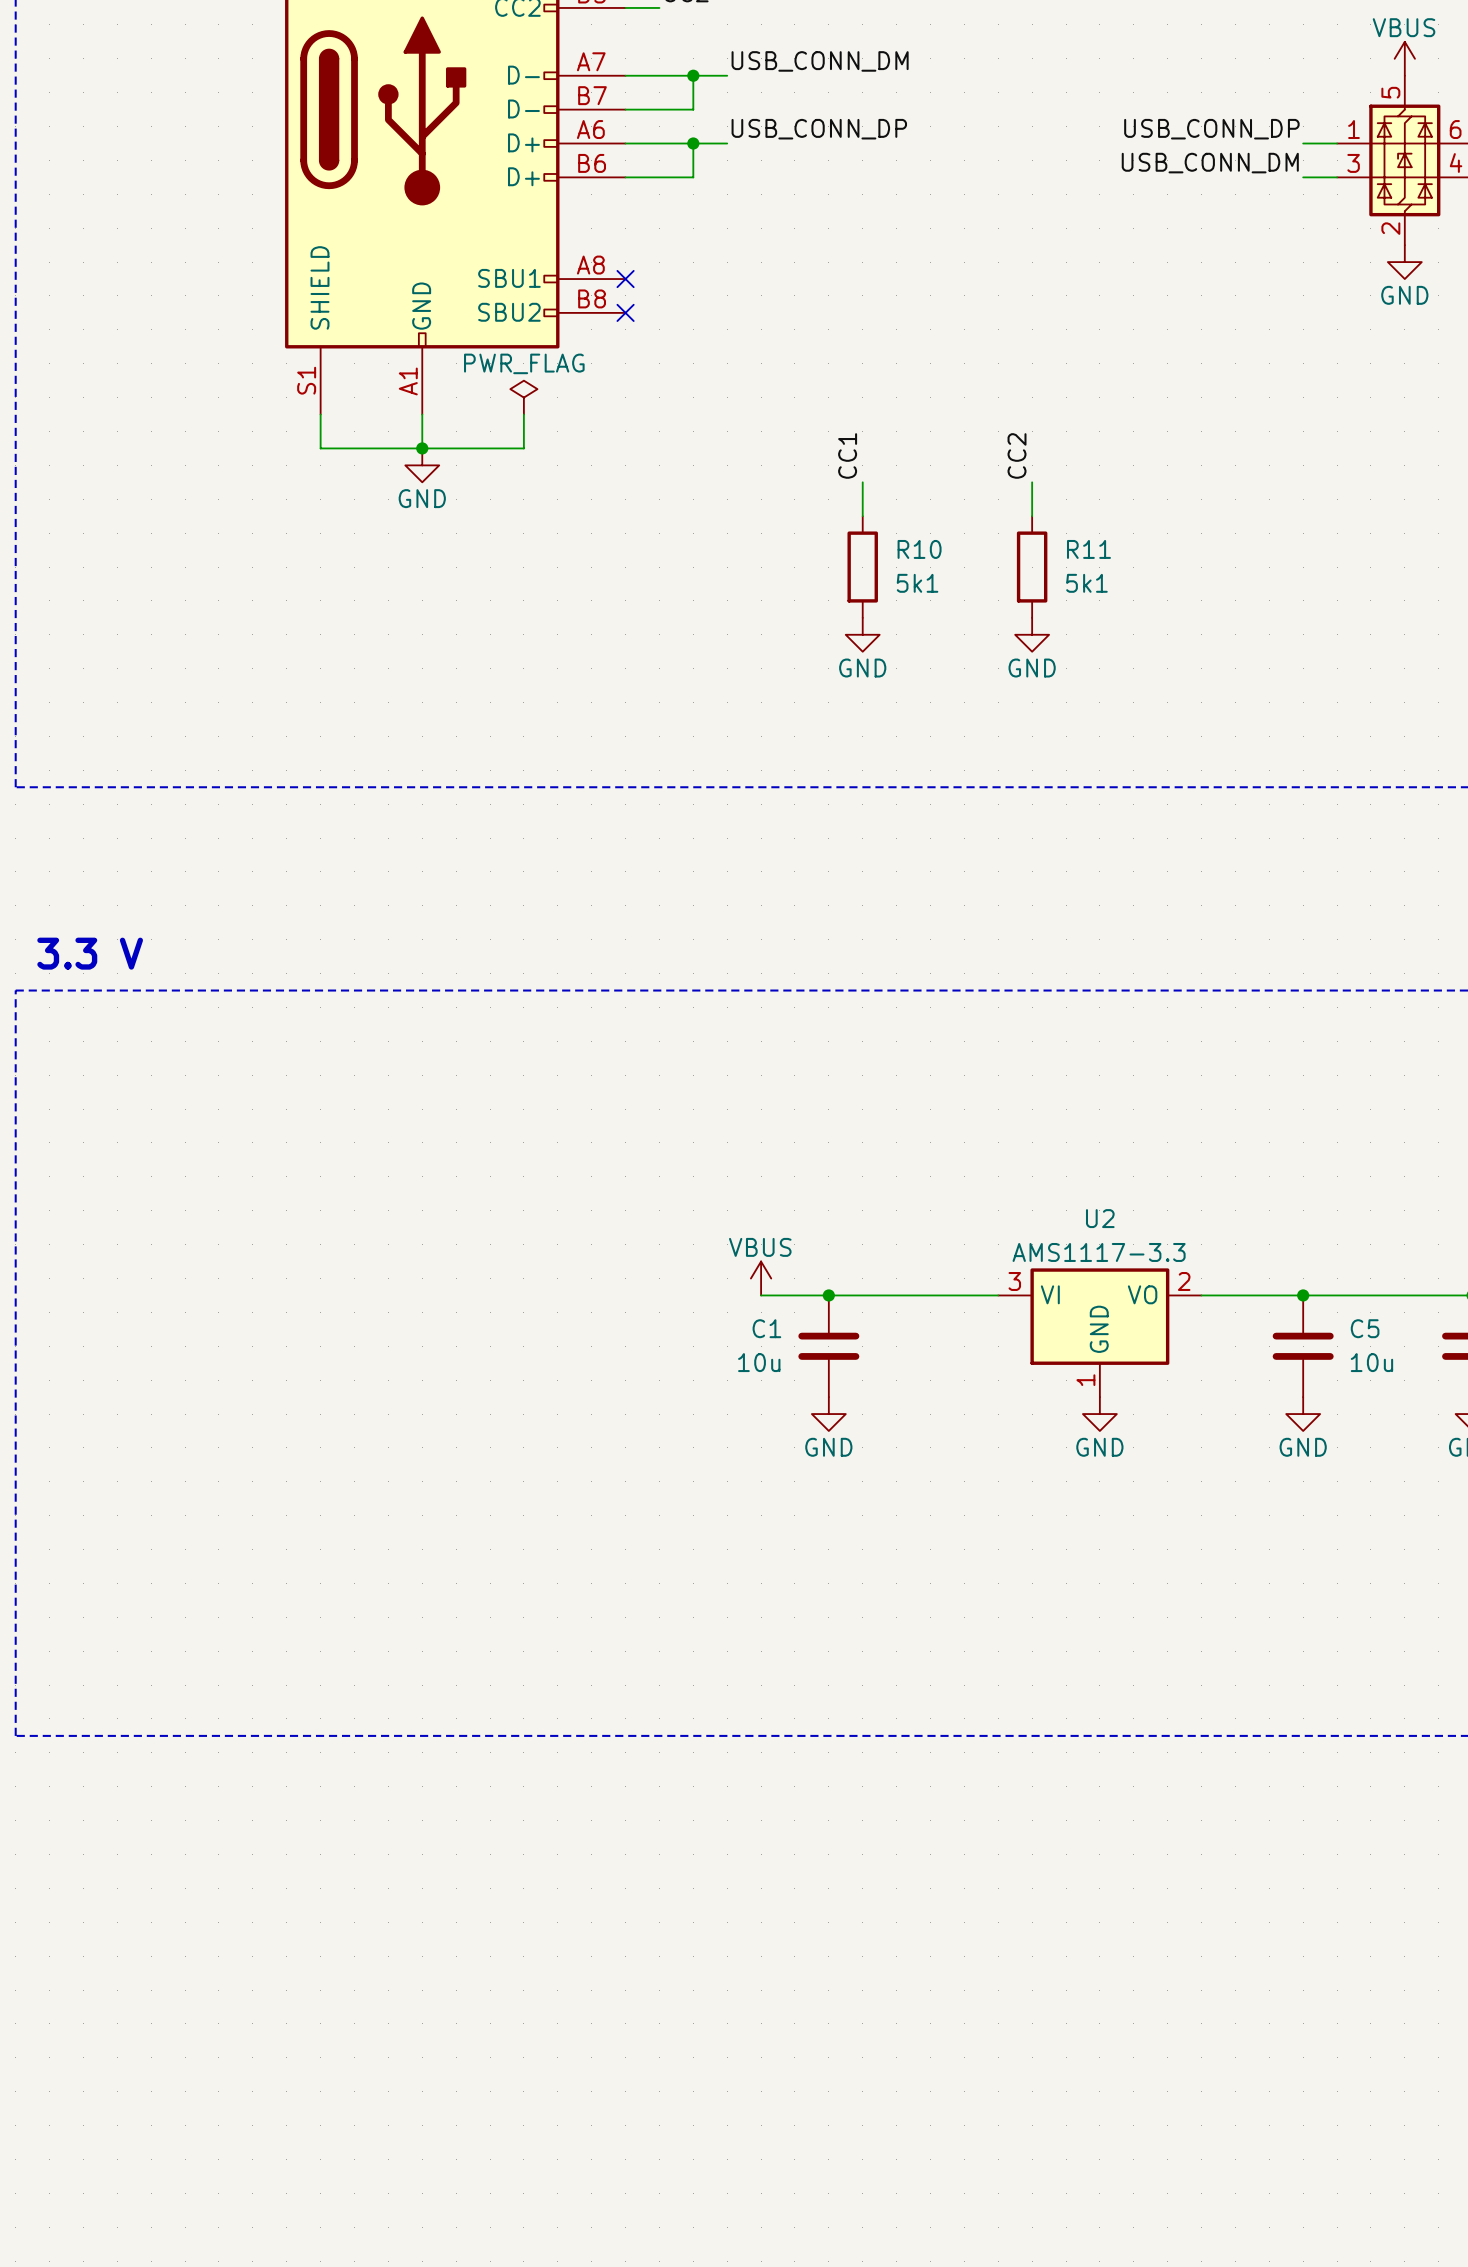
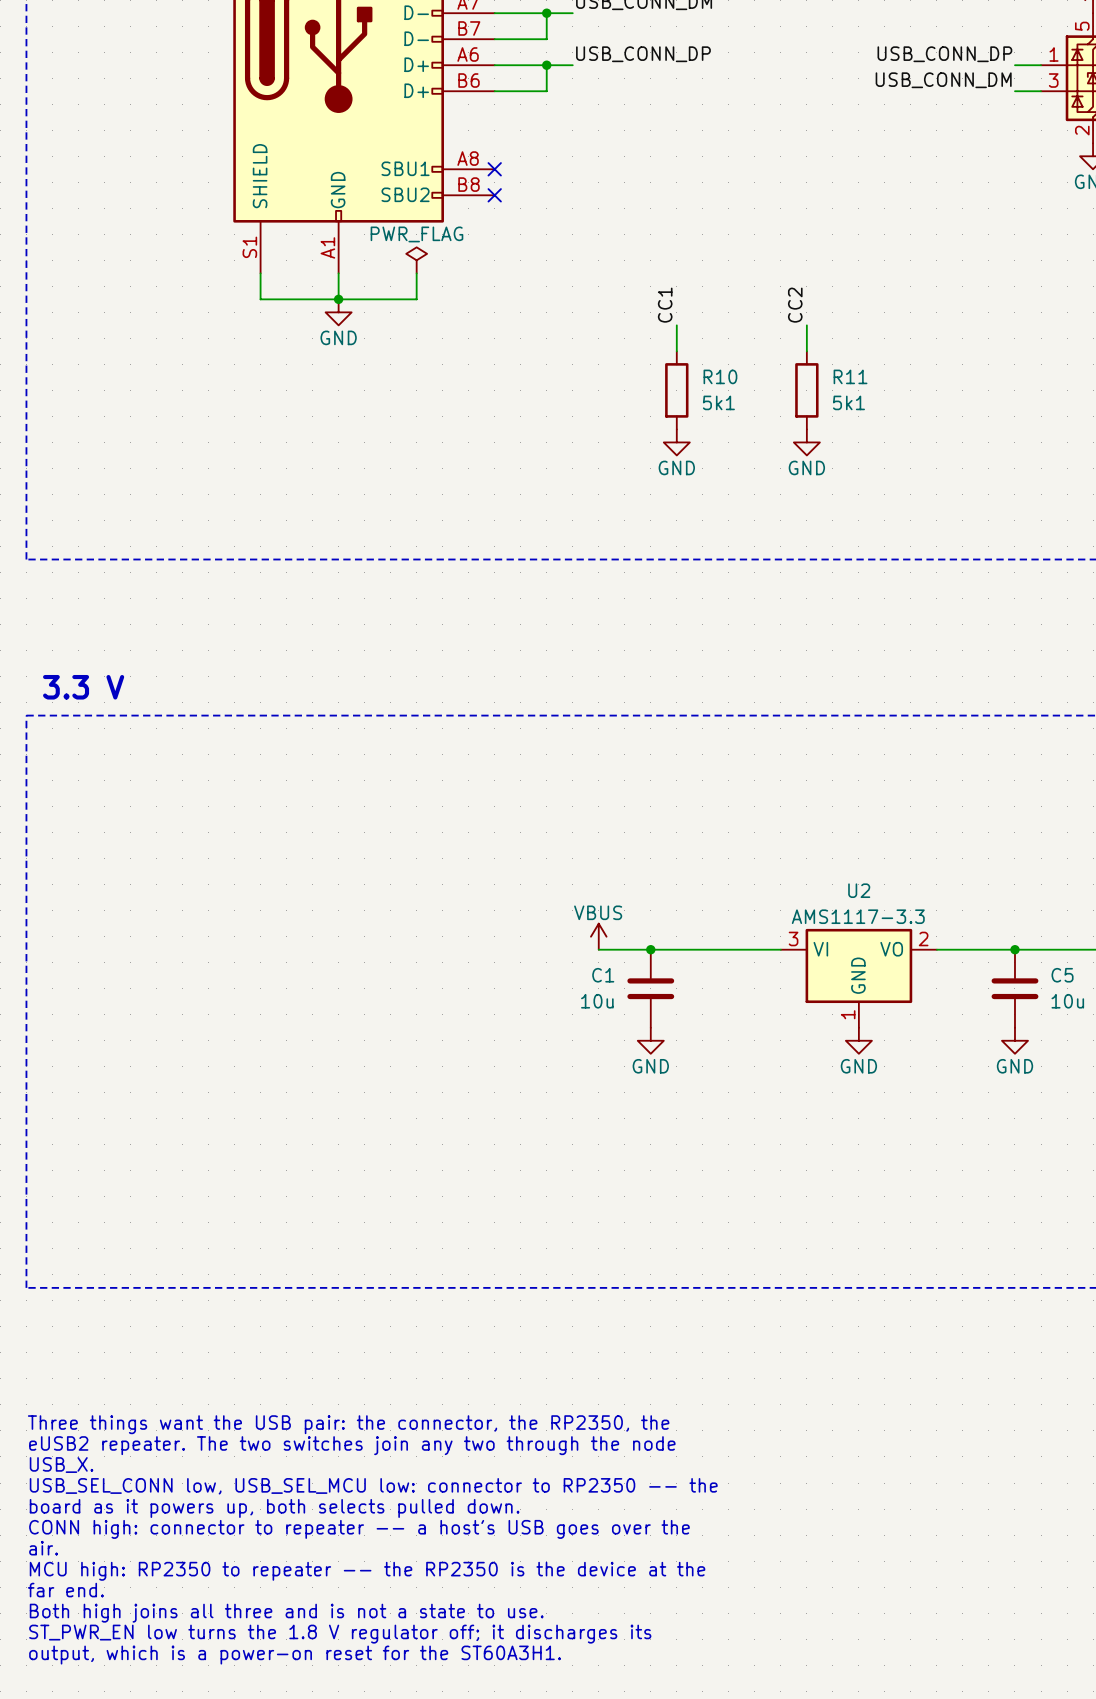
text: none -> Three things want the USB pair: the connector, the RP2350, the (348, 1424)
text: none -> eUSB2 repeater. The two switches join any two through the node (352, 1445)
text: none -> USB_X. (61, 1465)
text: none -> USB_SEL_CONN low, USB_SEL_MCU low: connector to RP2350 -- the (373, 1486)
text: none -> board as it powers up, both selects pulled down. (274, 1508)
text: none -> CONN high: connector to repeater -- a host's USB goes over the (359, 1529)
text: none -> air. (43, 1548)
text: none -> MCU high: RP2350 to repeater -- the RP2350 is the device at the (367, 1571)
text: none -> far end. (65, 1590)
text: none -> Both high joins all three and is not a state to use. (286, 1613)
text: none -> ST_PWR_EN low turns the 1.8 V regulator off; it discharges its (340, 1634)
text: none -> output, which is a power-on reset for the ST60A3H1. (295, 1655)

